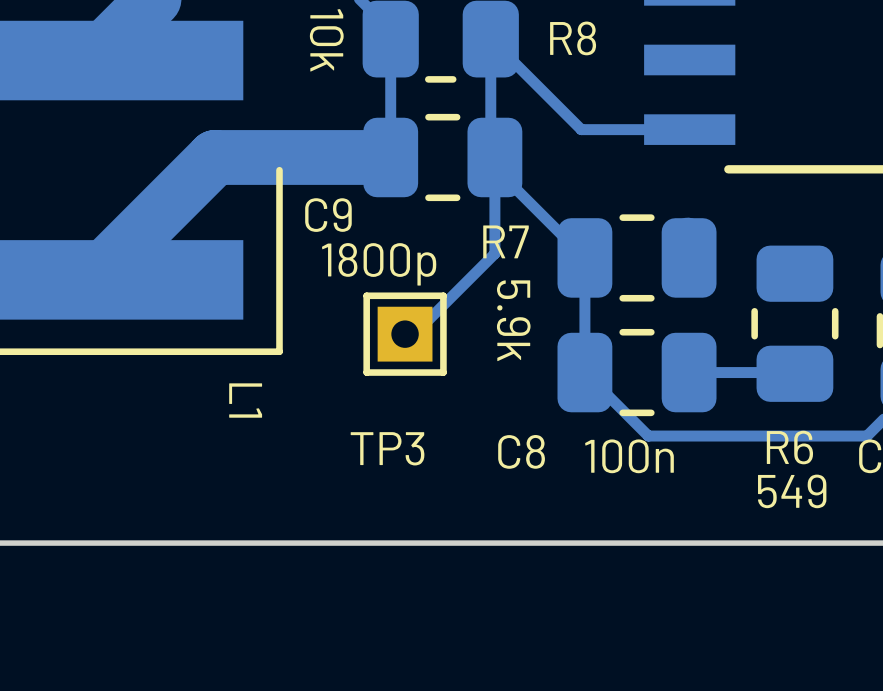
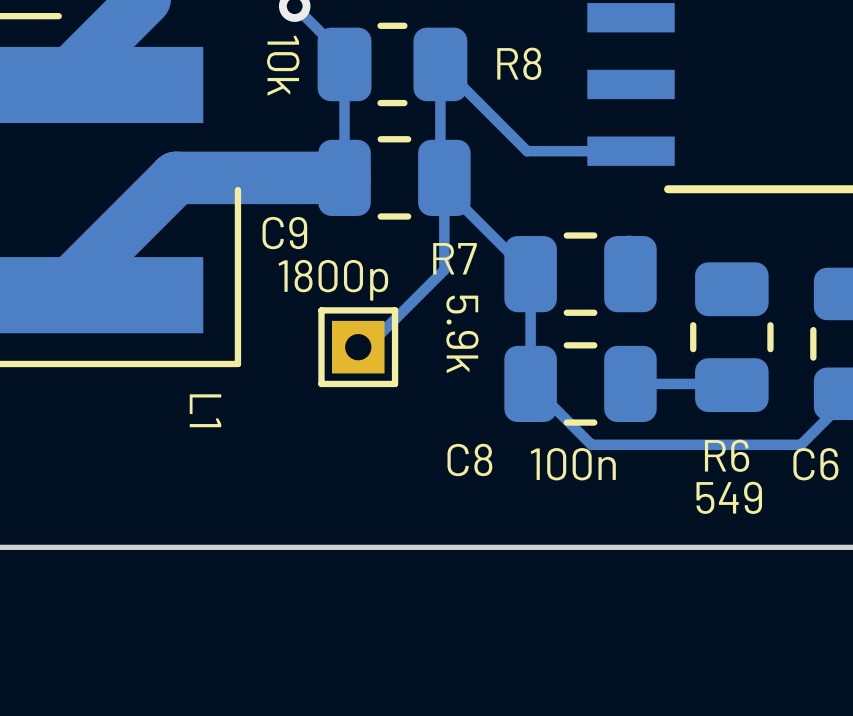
TP3 name: TP3 (387, 448) -> none

